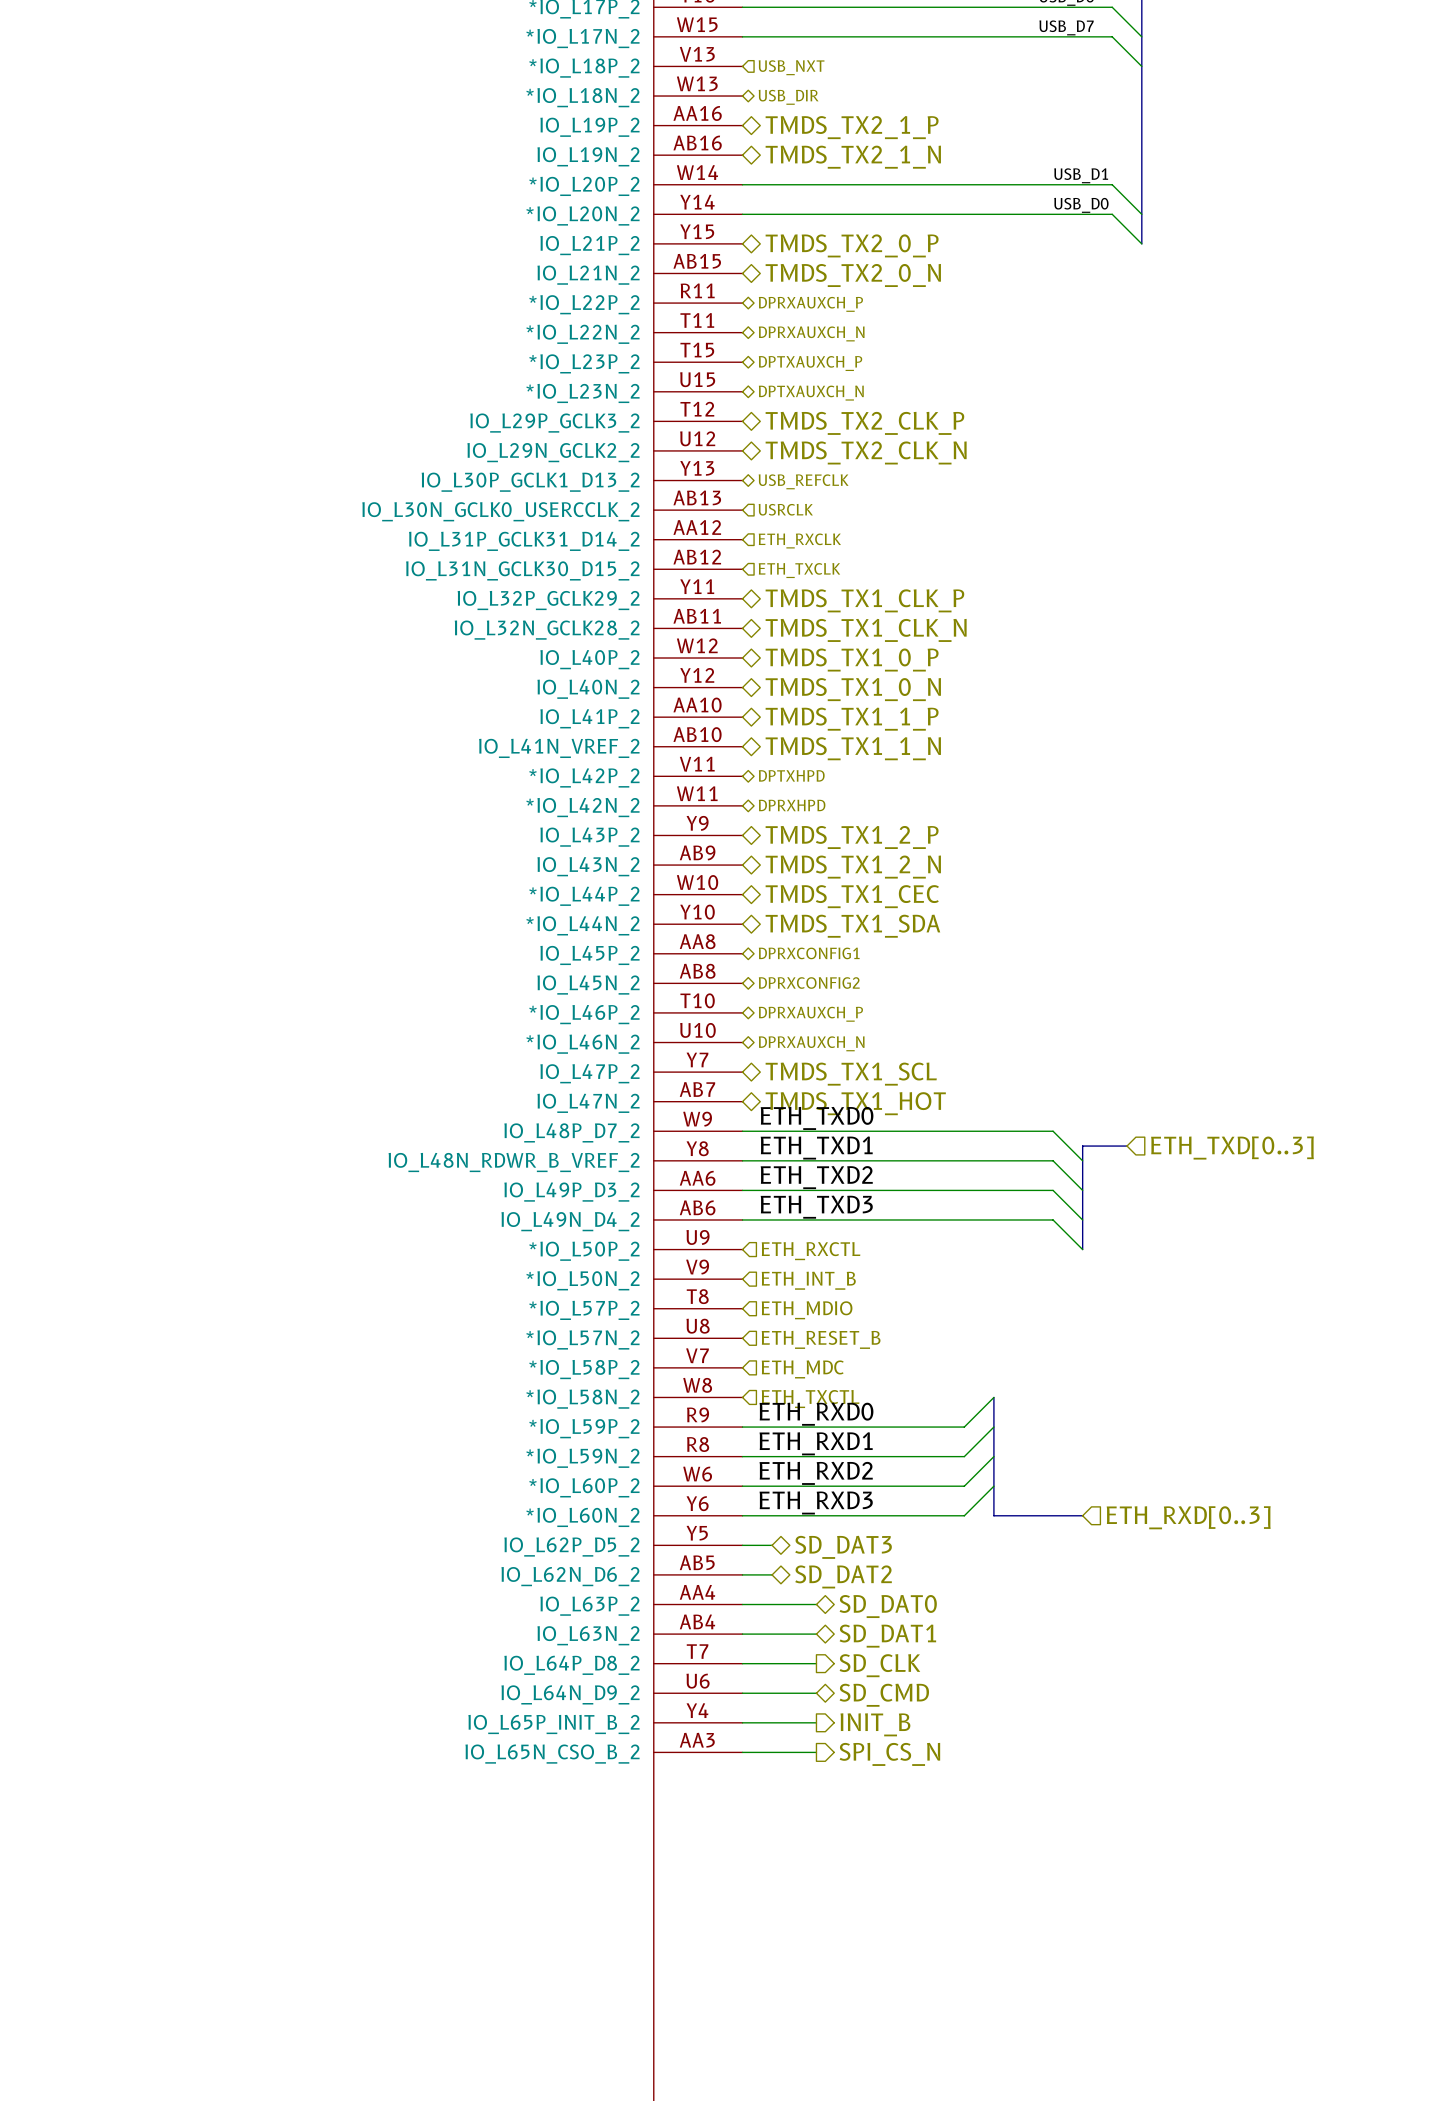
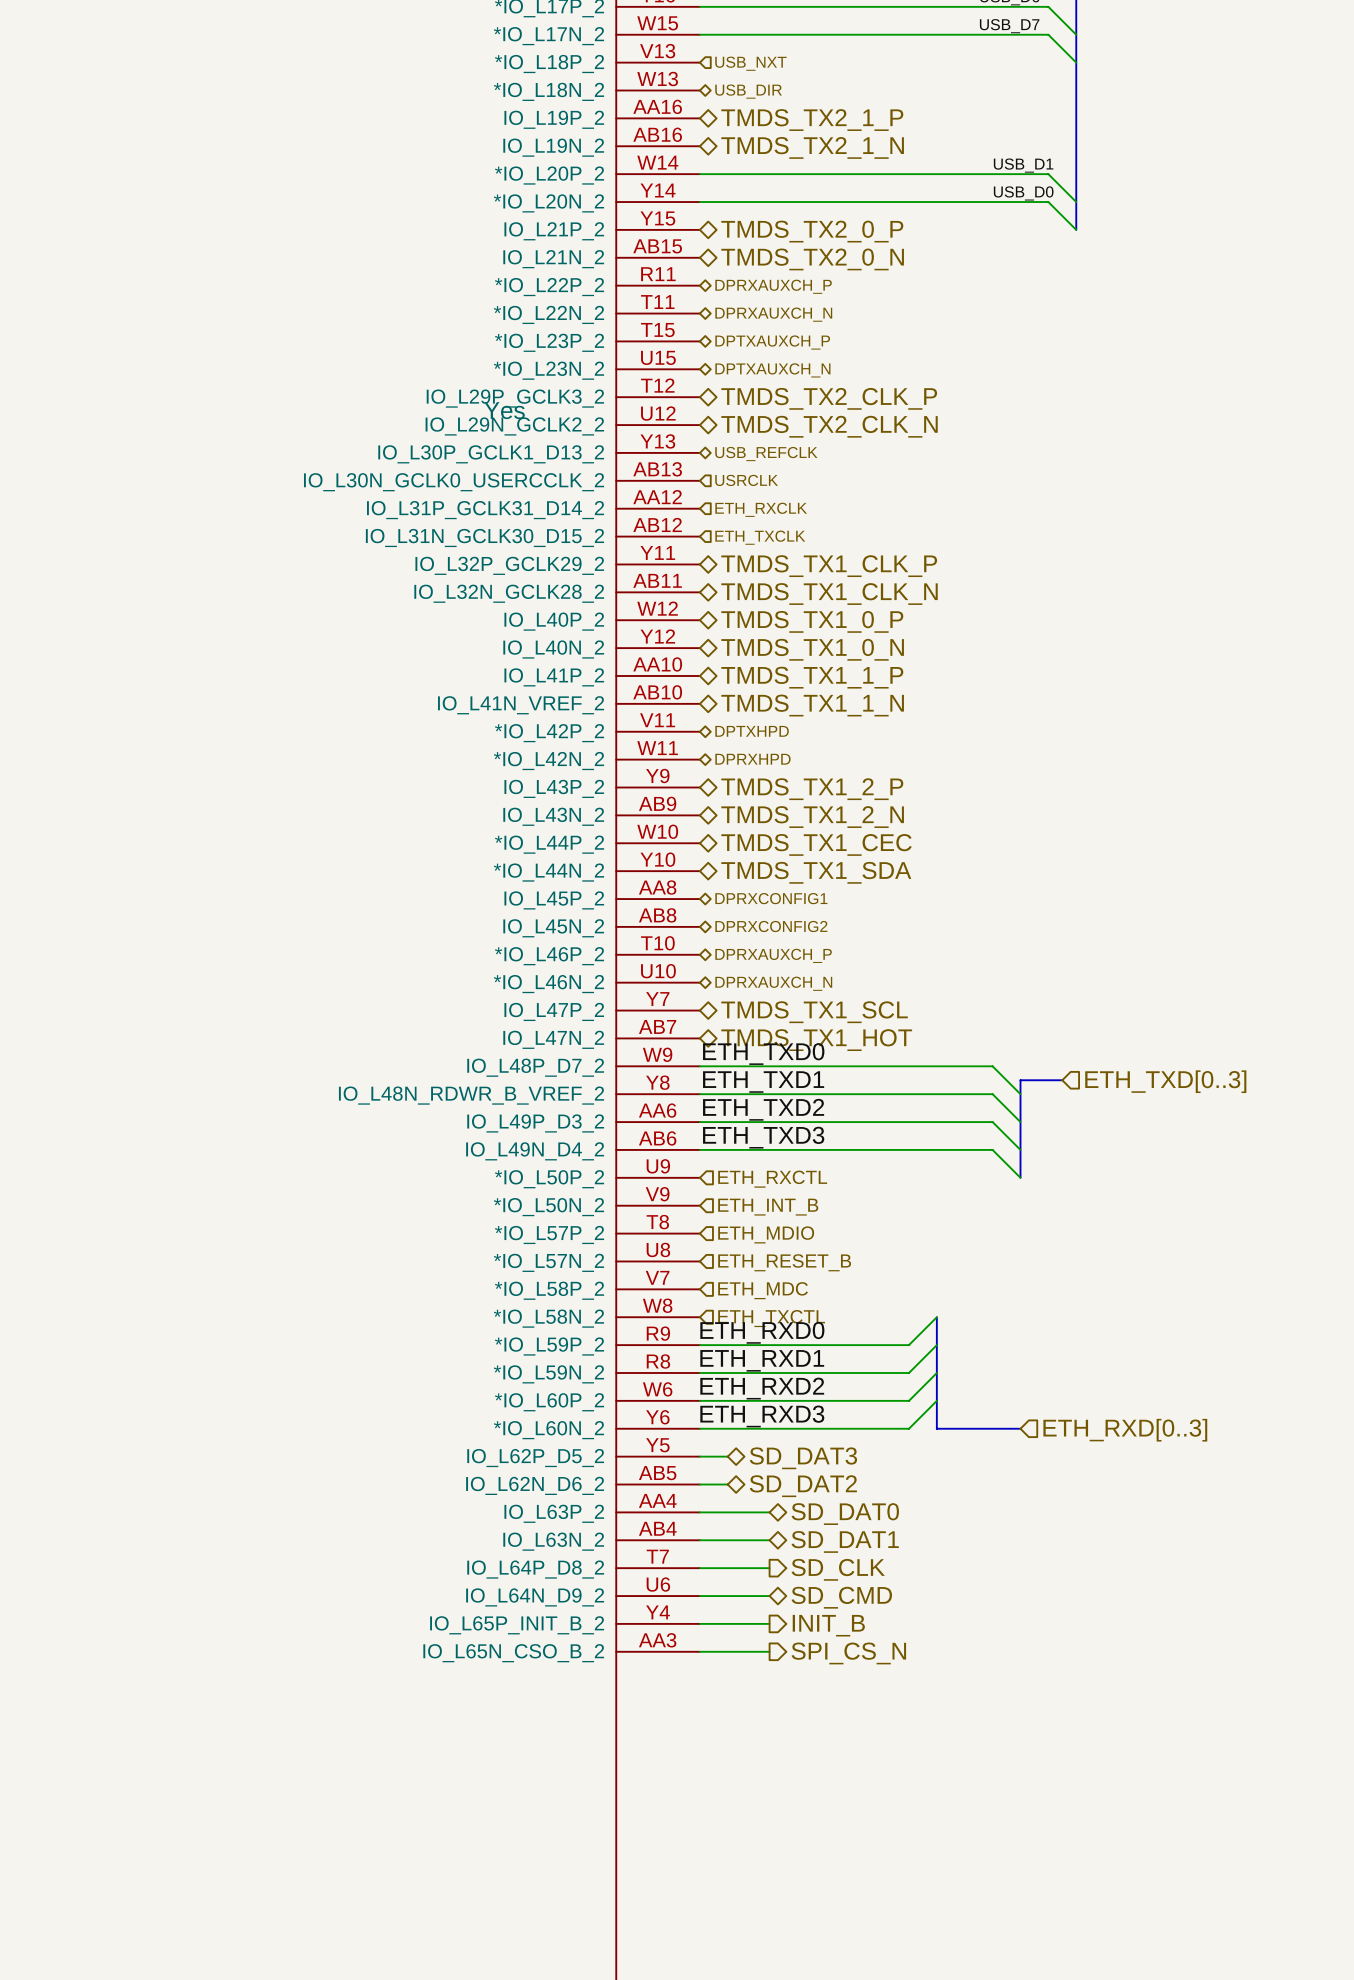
part text: none -> Yes (504, 410)

